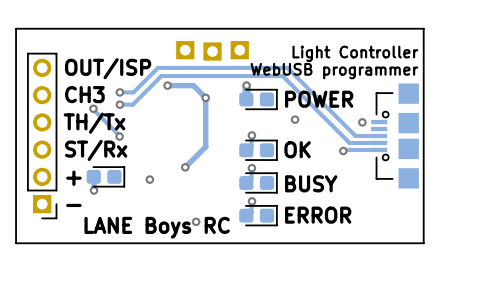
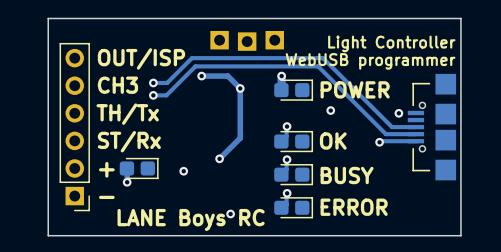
track: (93, 108) (119, 136) -> none
via: (93, 108) -> none
via: (119, 136) -> none

